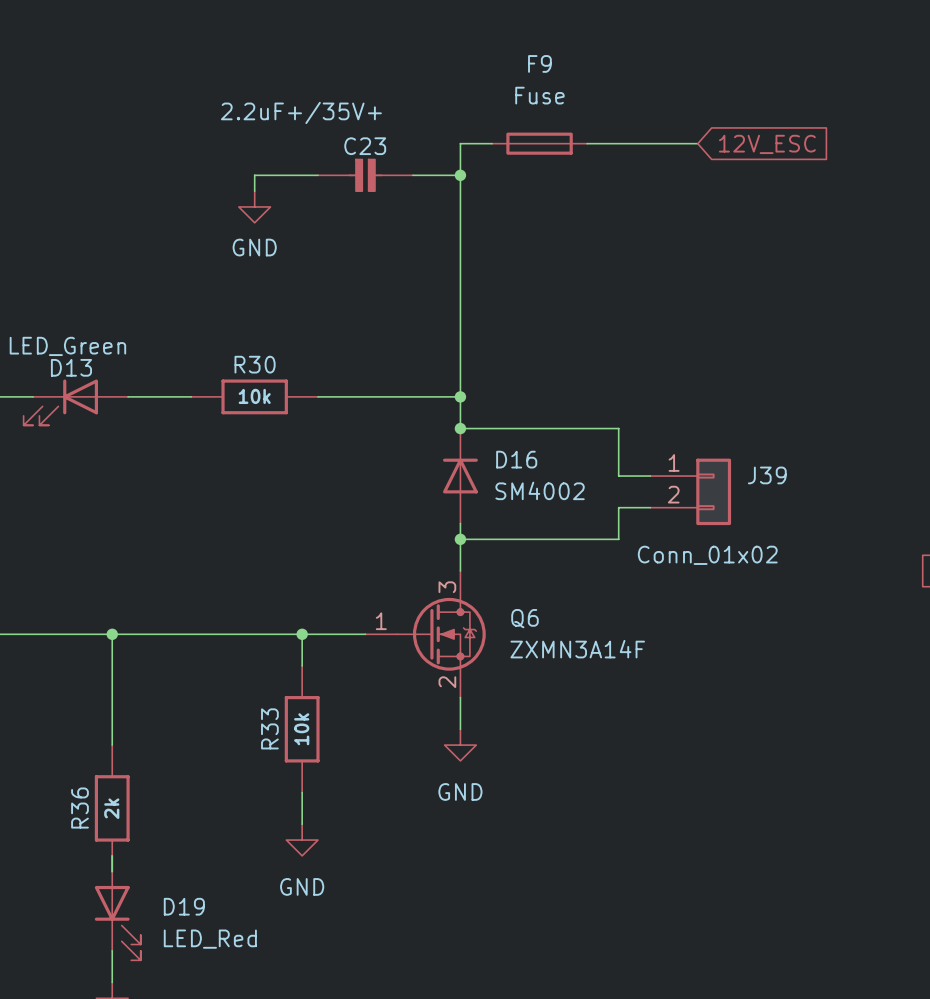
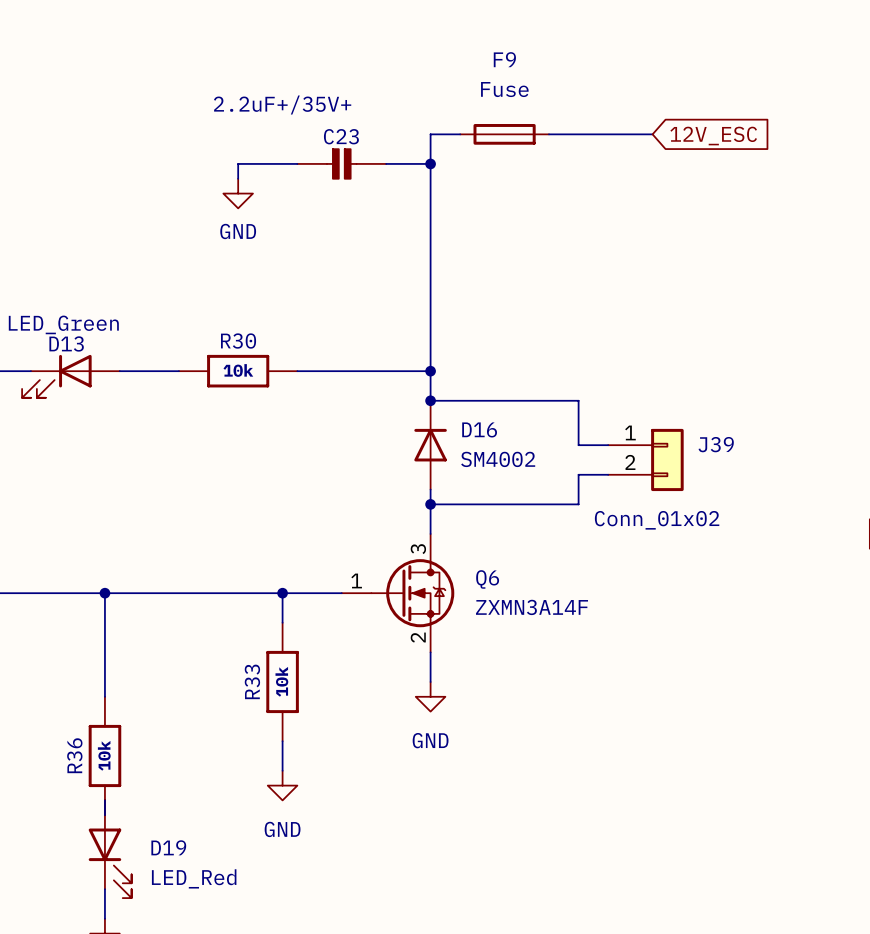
R36 value: 2k (111, 808) -> 10k (104, 755)

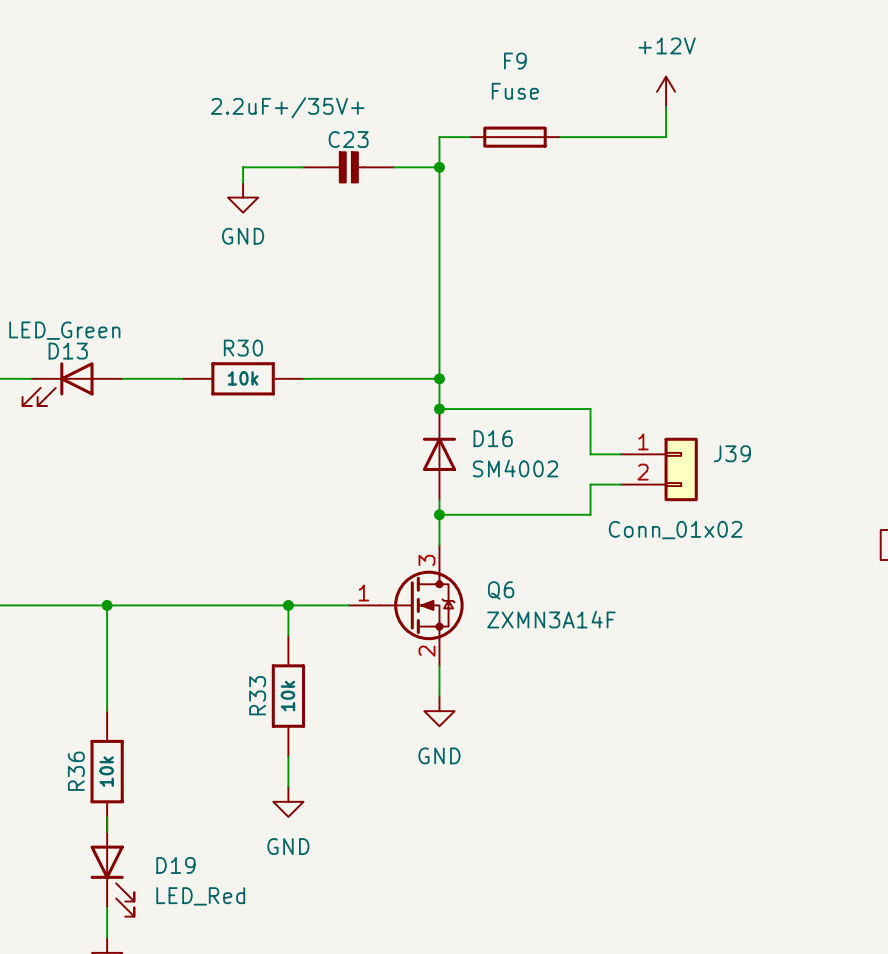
power symbol: none -> +12V (666, 91)
wire: none -> (666, 106) (666, 137)
global label: 12V_ESC (713, 136) -> none

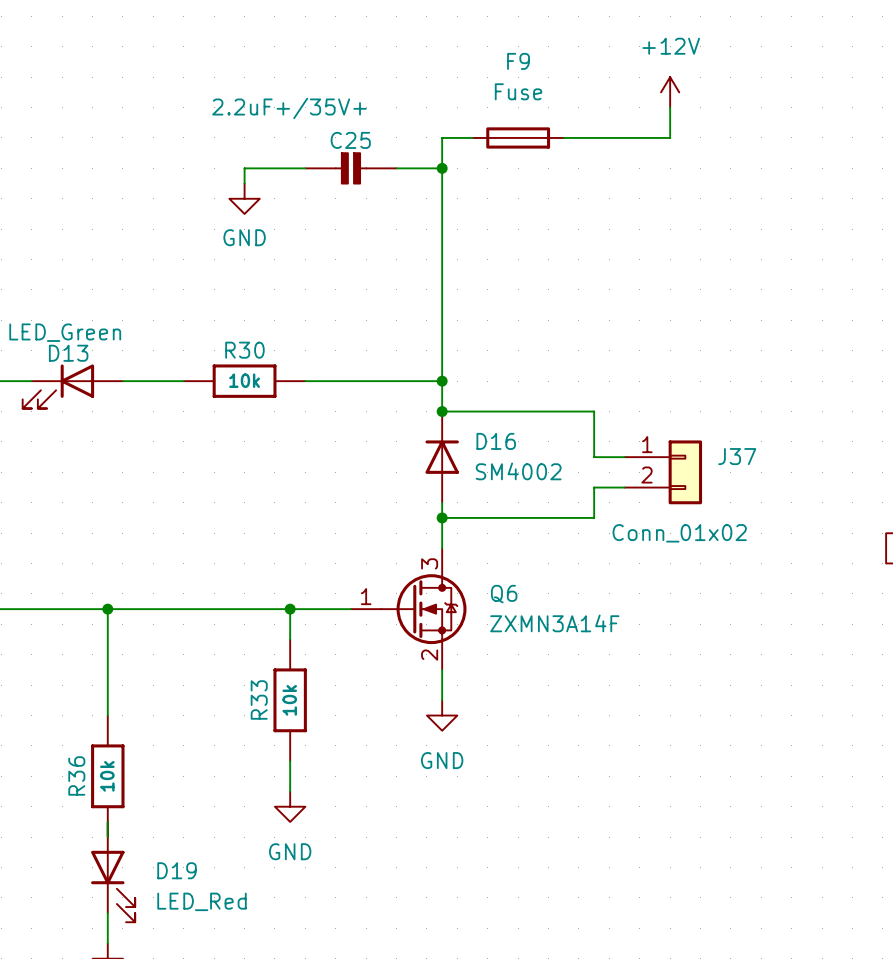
C23 name: C23 (348, 139) -> C25 (350, 140)
J39 name: J39 (732, 453) -> J37 (737, 456)

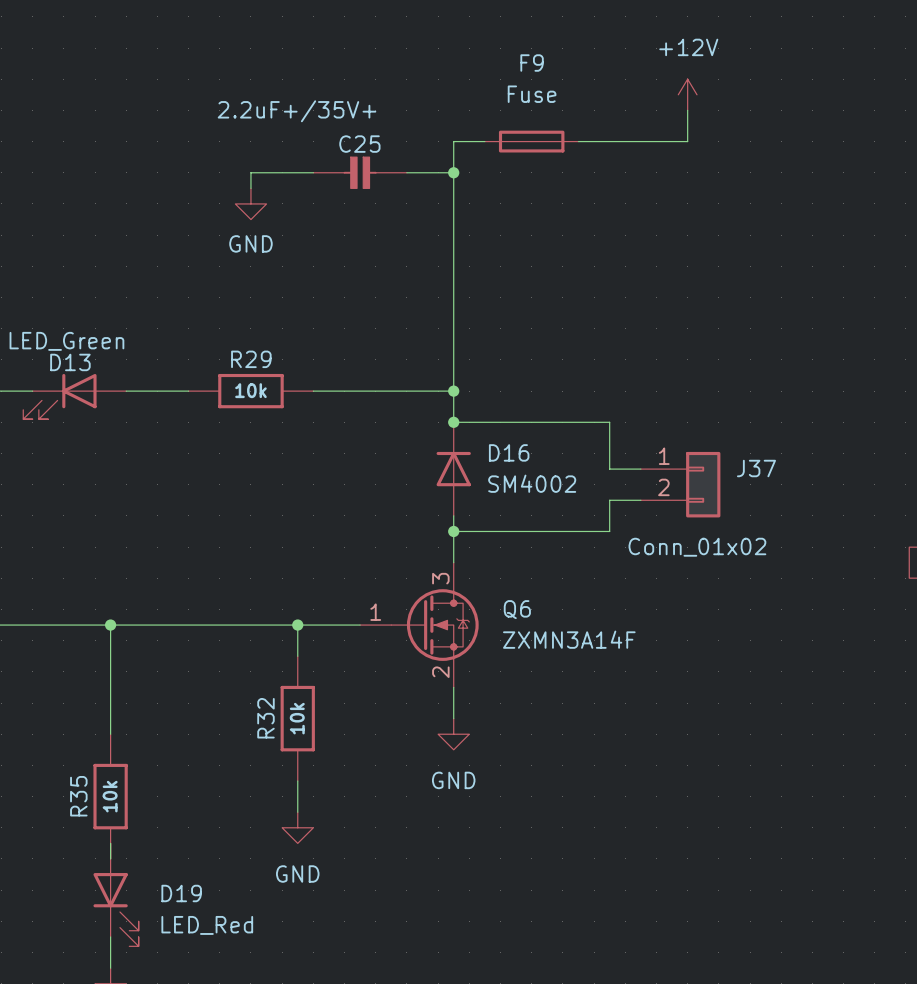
R30 name: R30 (244, 350) -> R29 (251, 359)
R33 name: R33 (259, 699) -> R32 (265, 718)
R36 name: R36 (76, 775) -> R35 (78, 796)

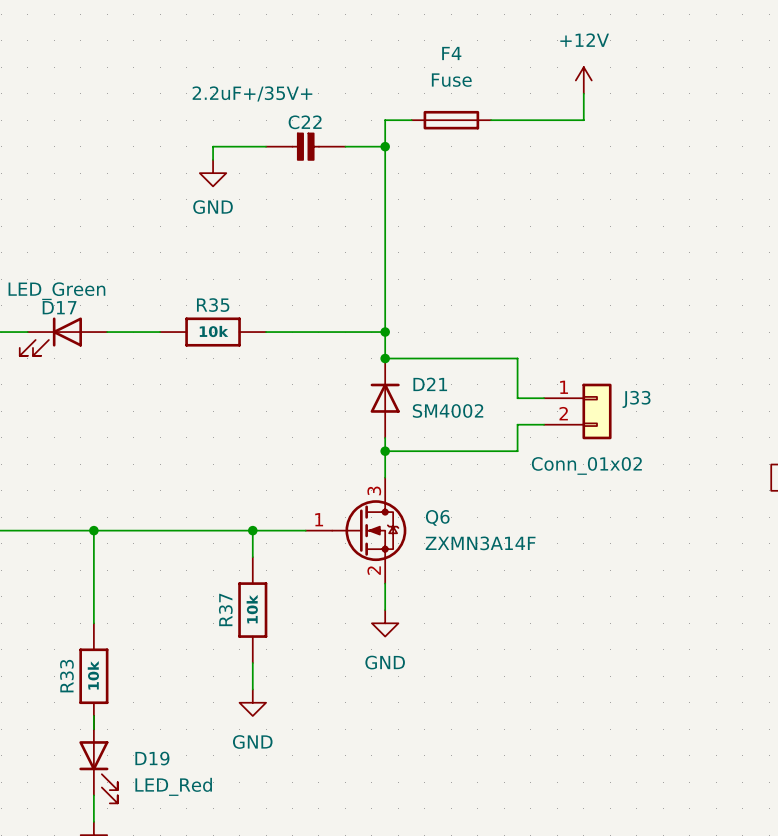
F9 name: F9 (532, 63) -> F4 (451, 53)
C25 name: C25 (359, 144) -> C22 (305, 122)
R29 name: R29 (251, 359) -> R35 (213, 305)
D13 name: D13 (70, 362) -> D17 (59, 307)
D16 name: D16 (509, 452) -> D21 (430, 384)
J37 name: J37 (756, 468) -> J33 (636, 399)
R32 name: R32 (265, 718) -> R37 (225, 609)
R35 name: R35 (78, 796) -> R33 (66, 676)

